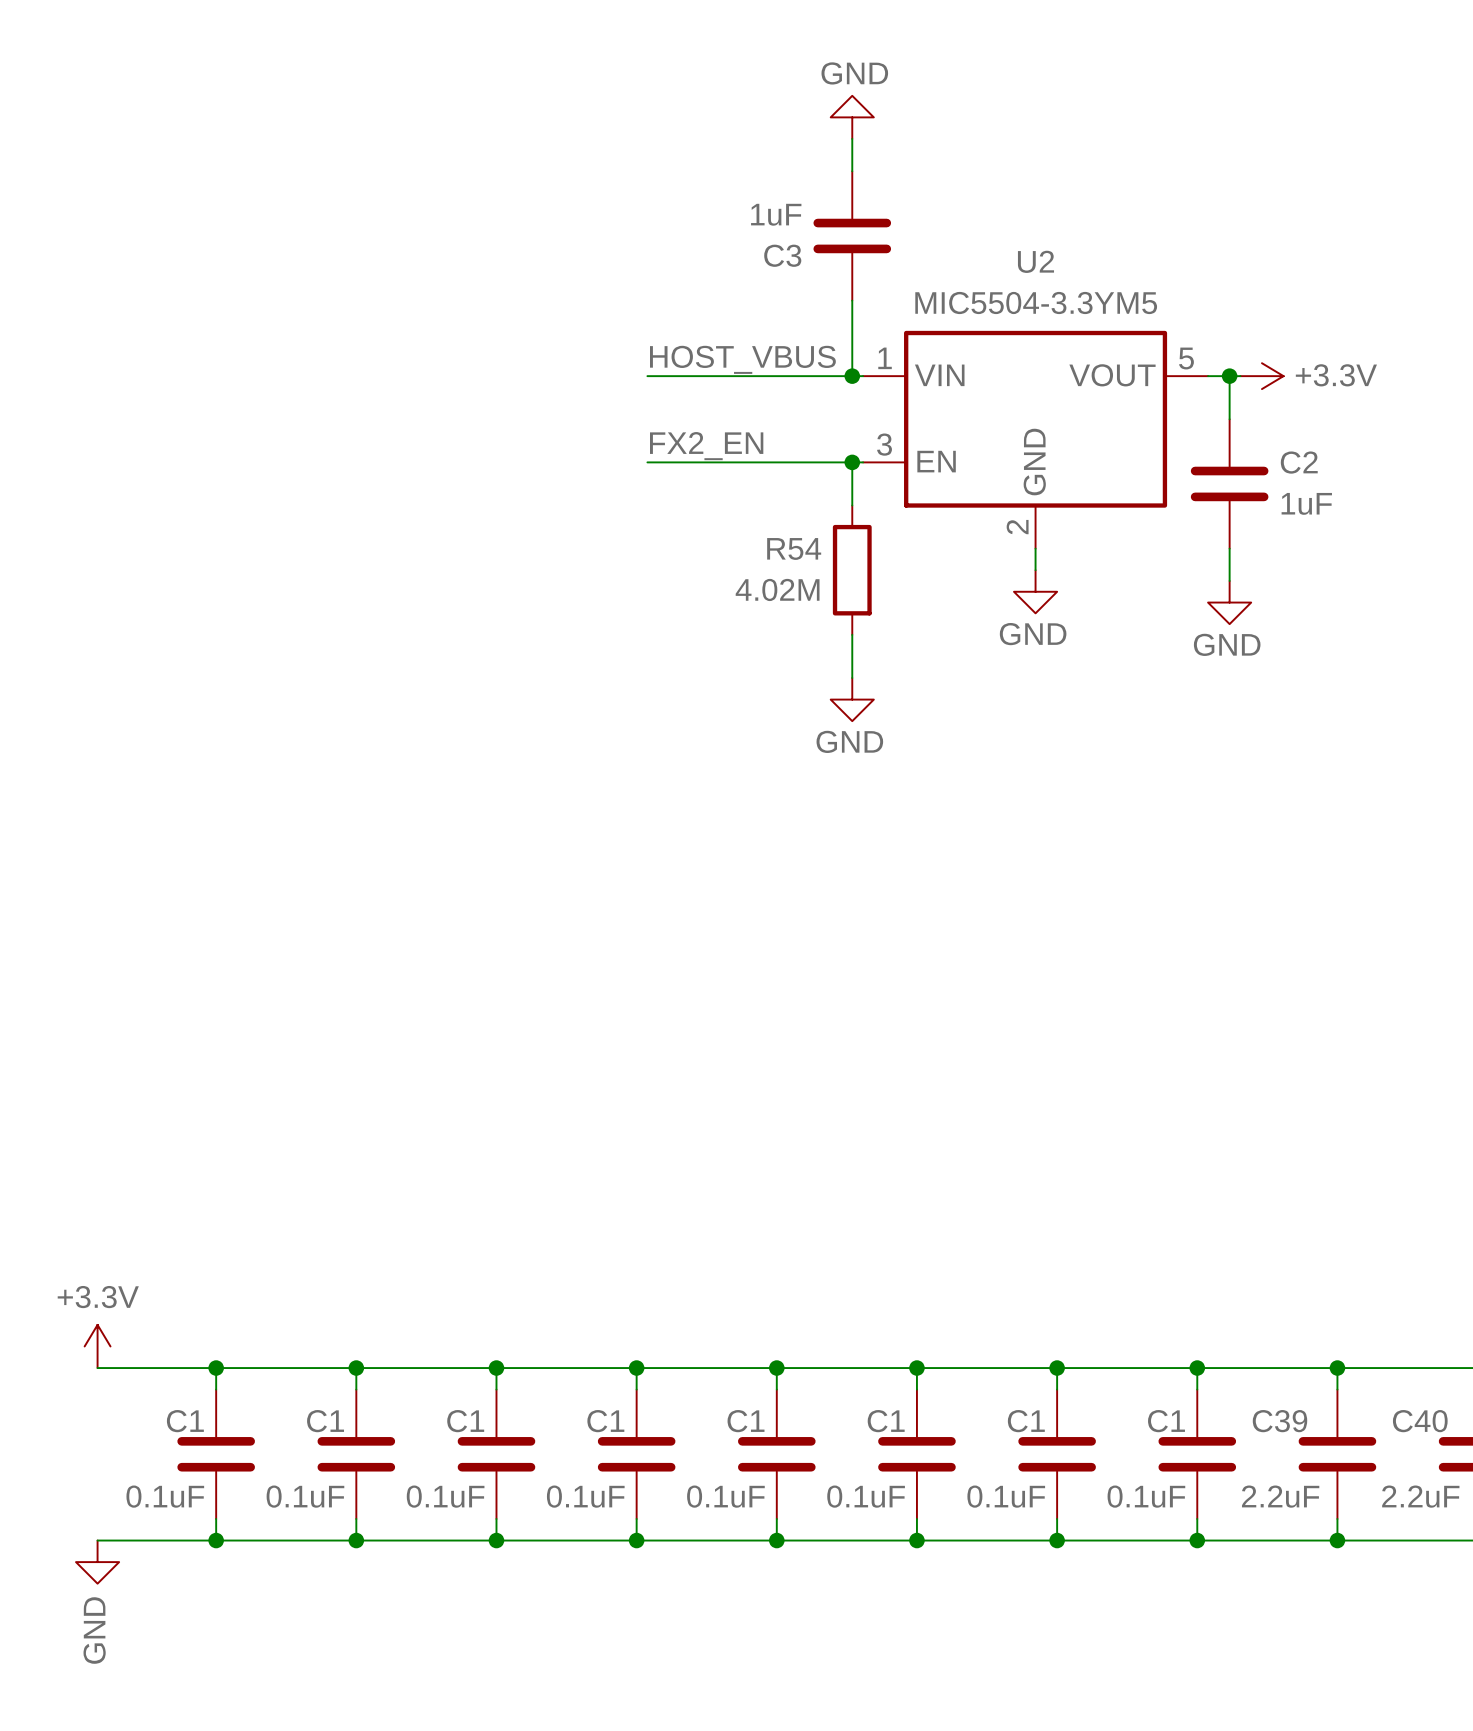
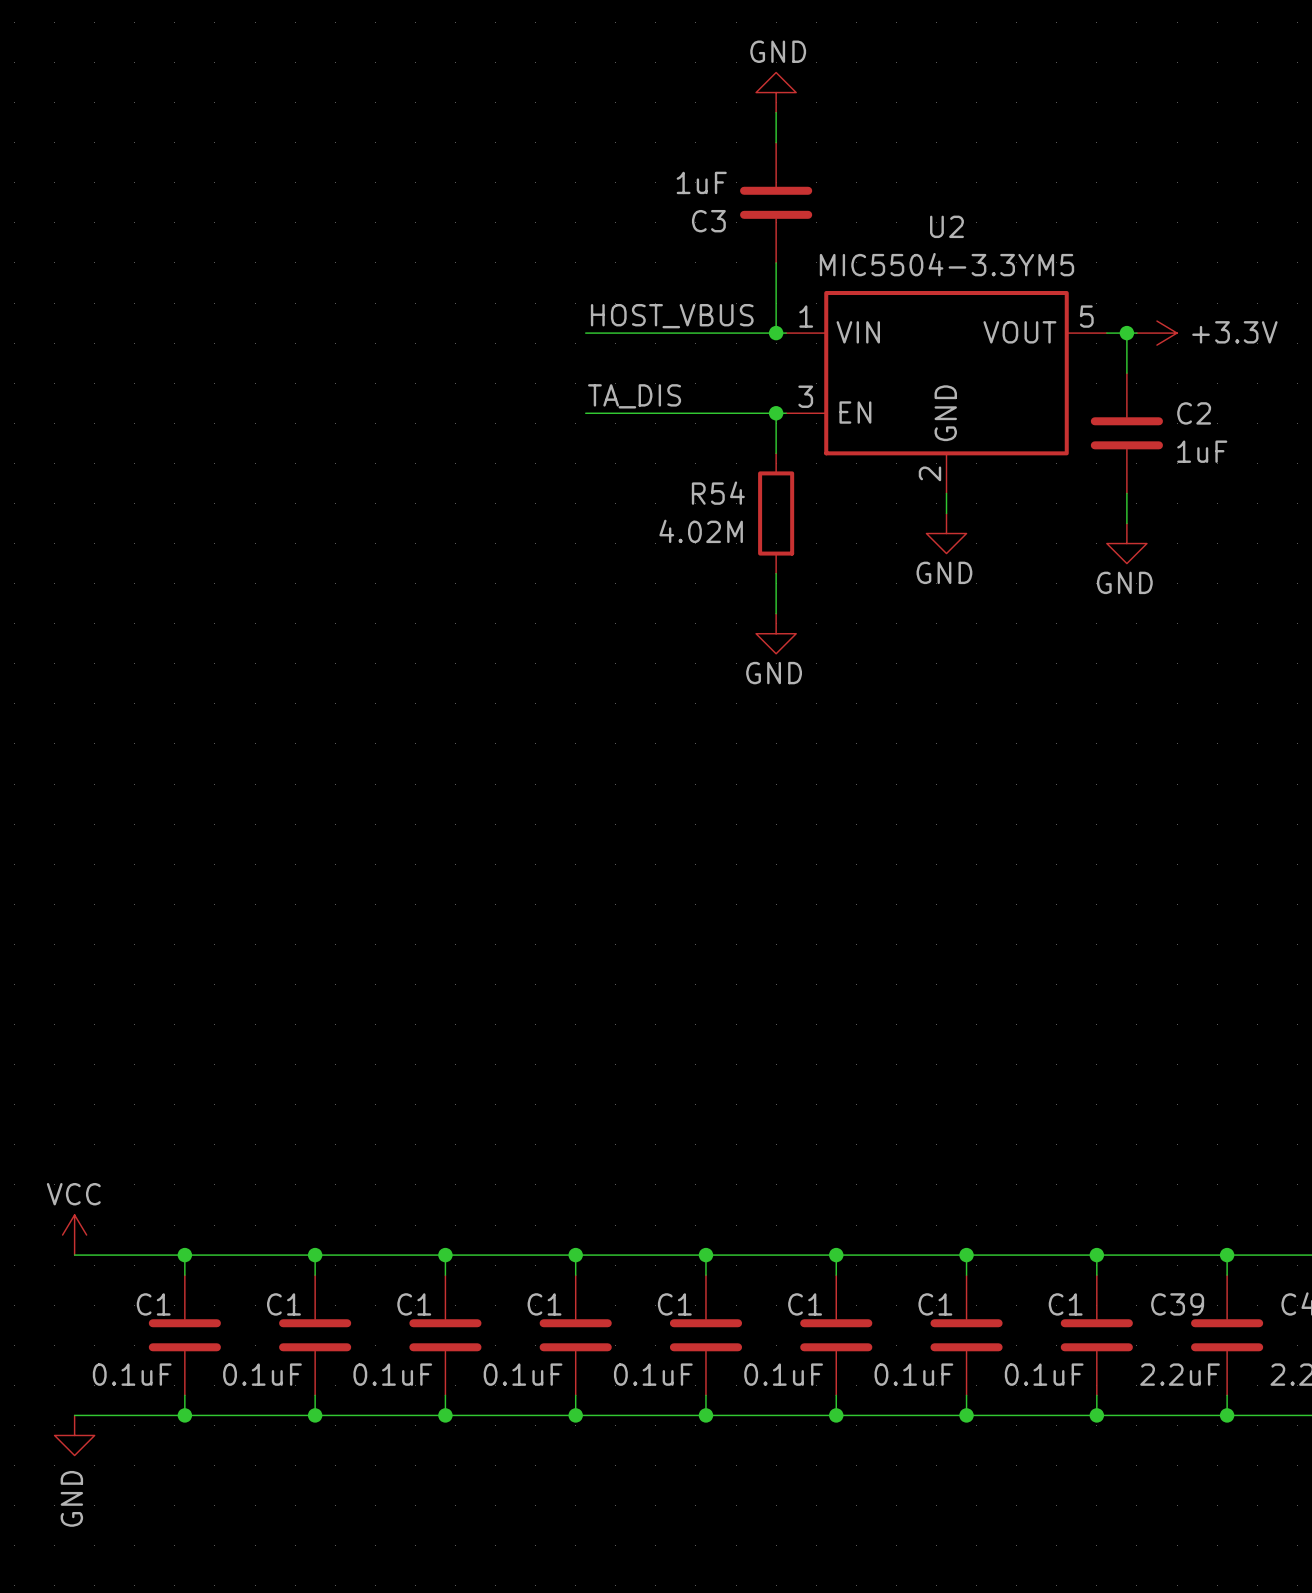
label: FX2_EN (706, 446) -> TA_DIS (634, 396)
power symbol: +3.3V (97, 1346) -> VCC (74, 1235)

